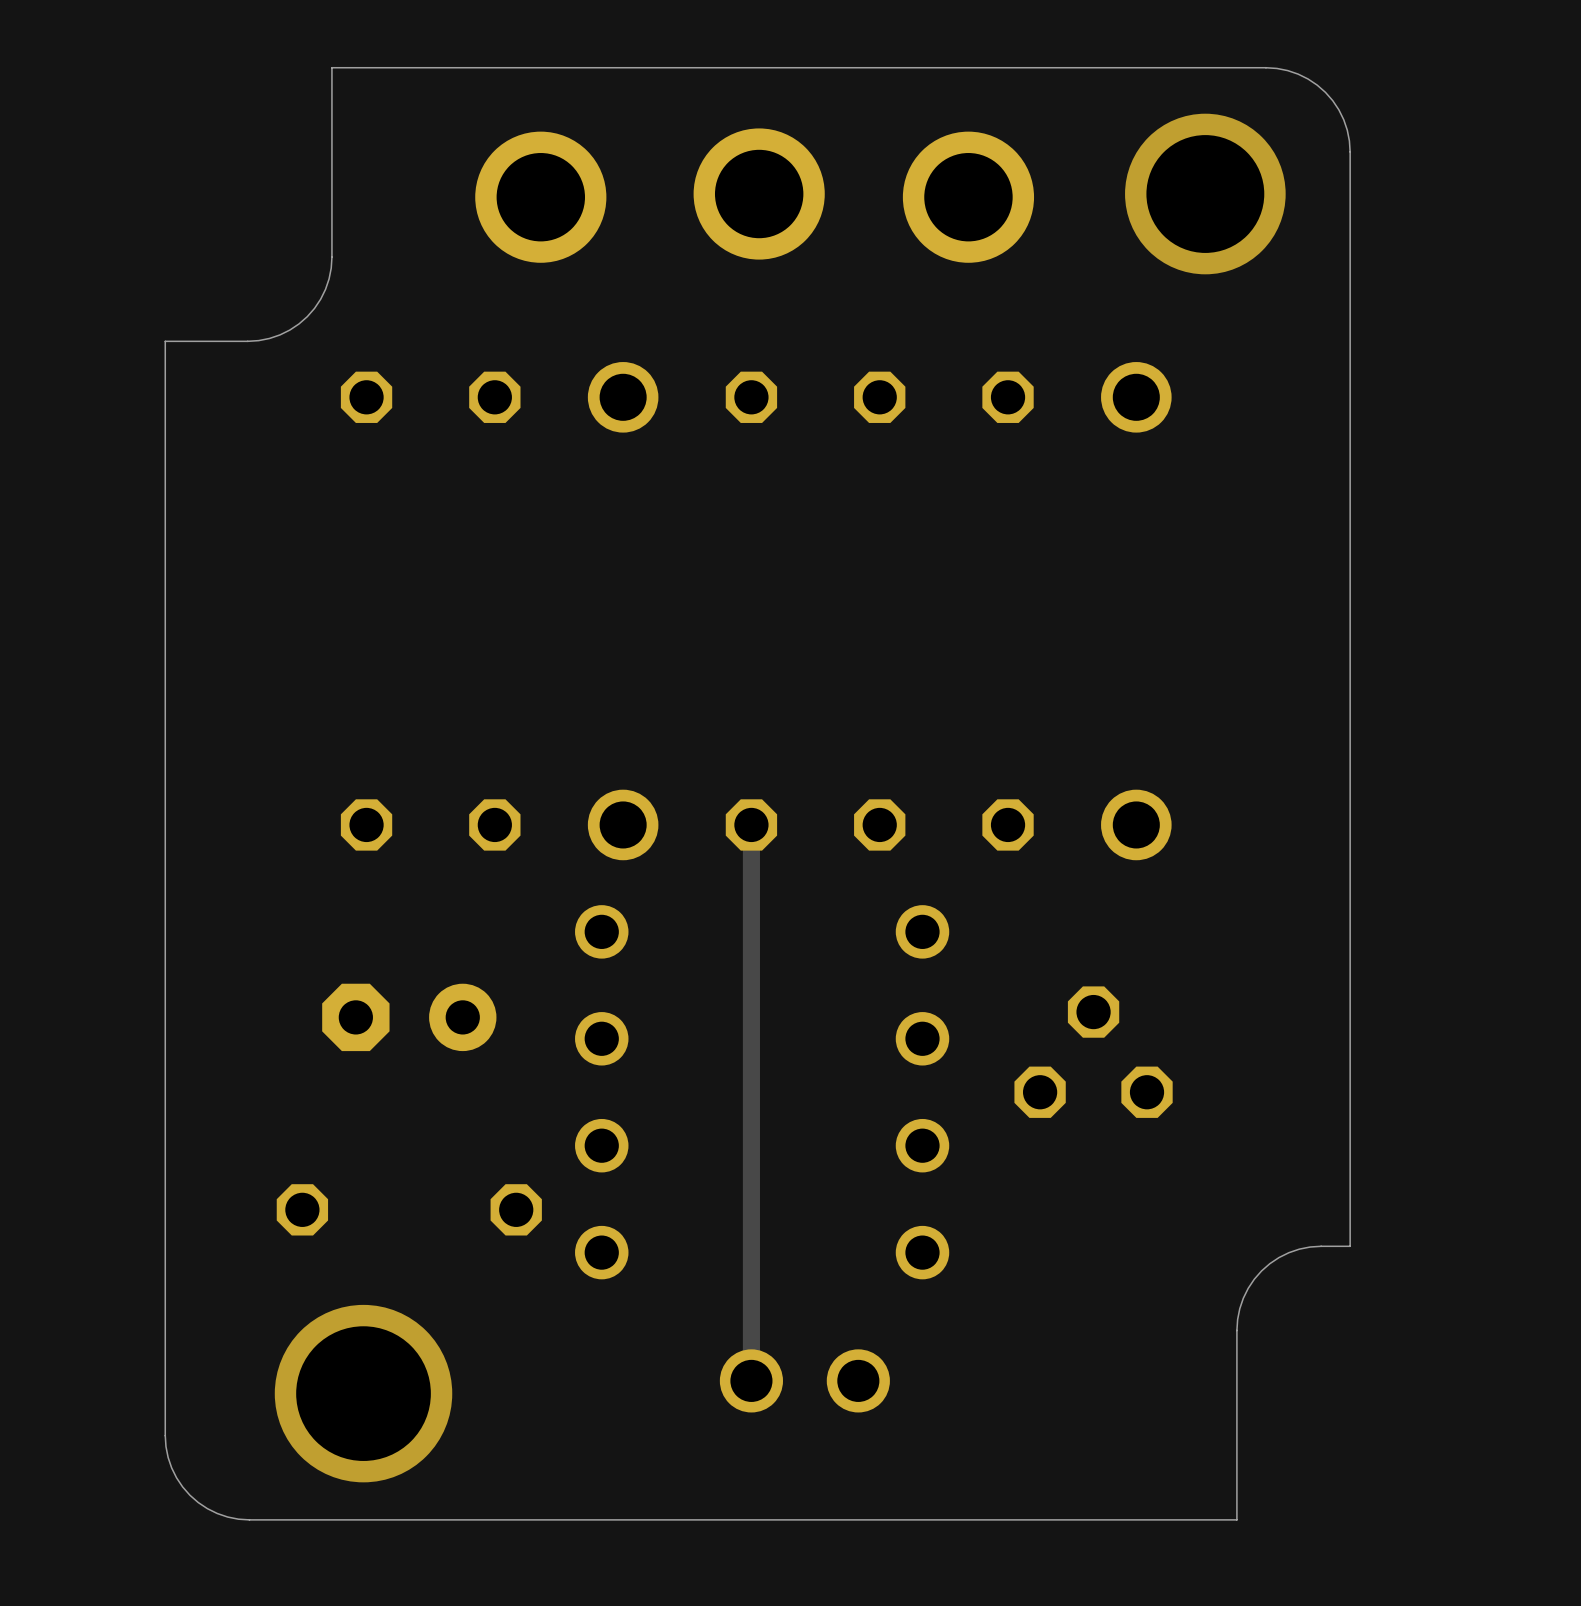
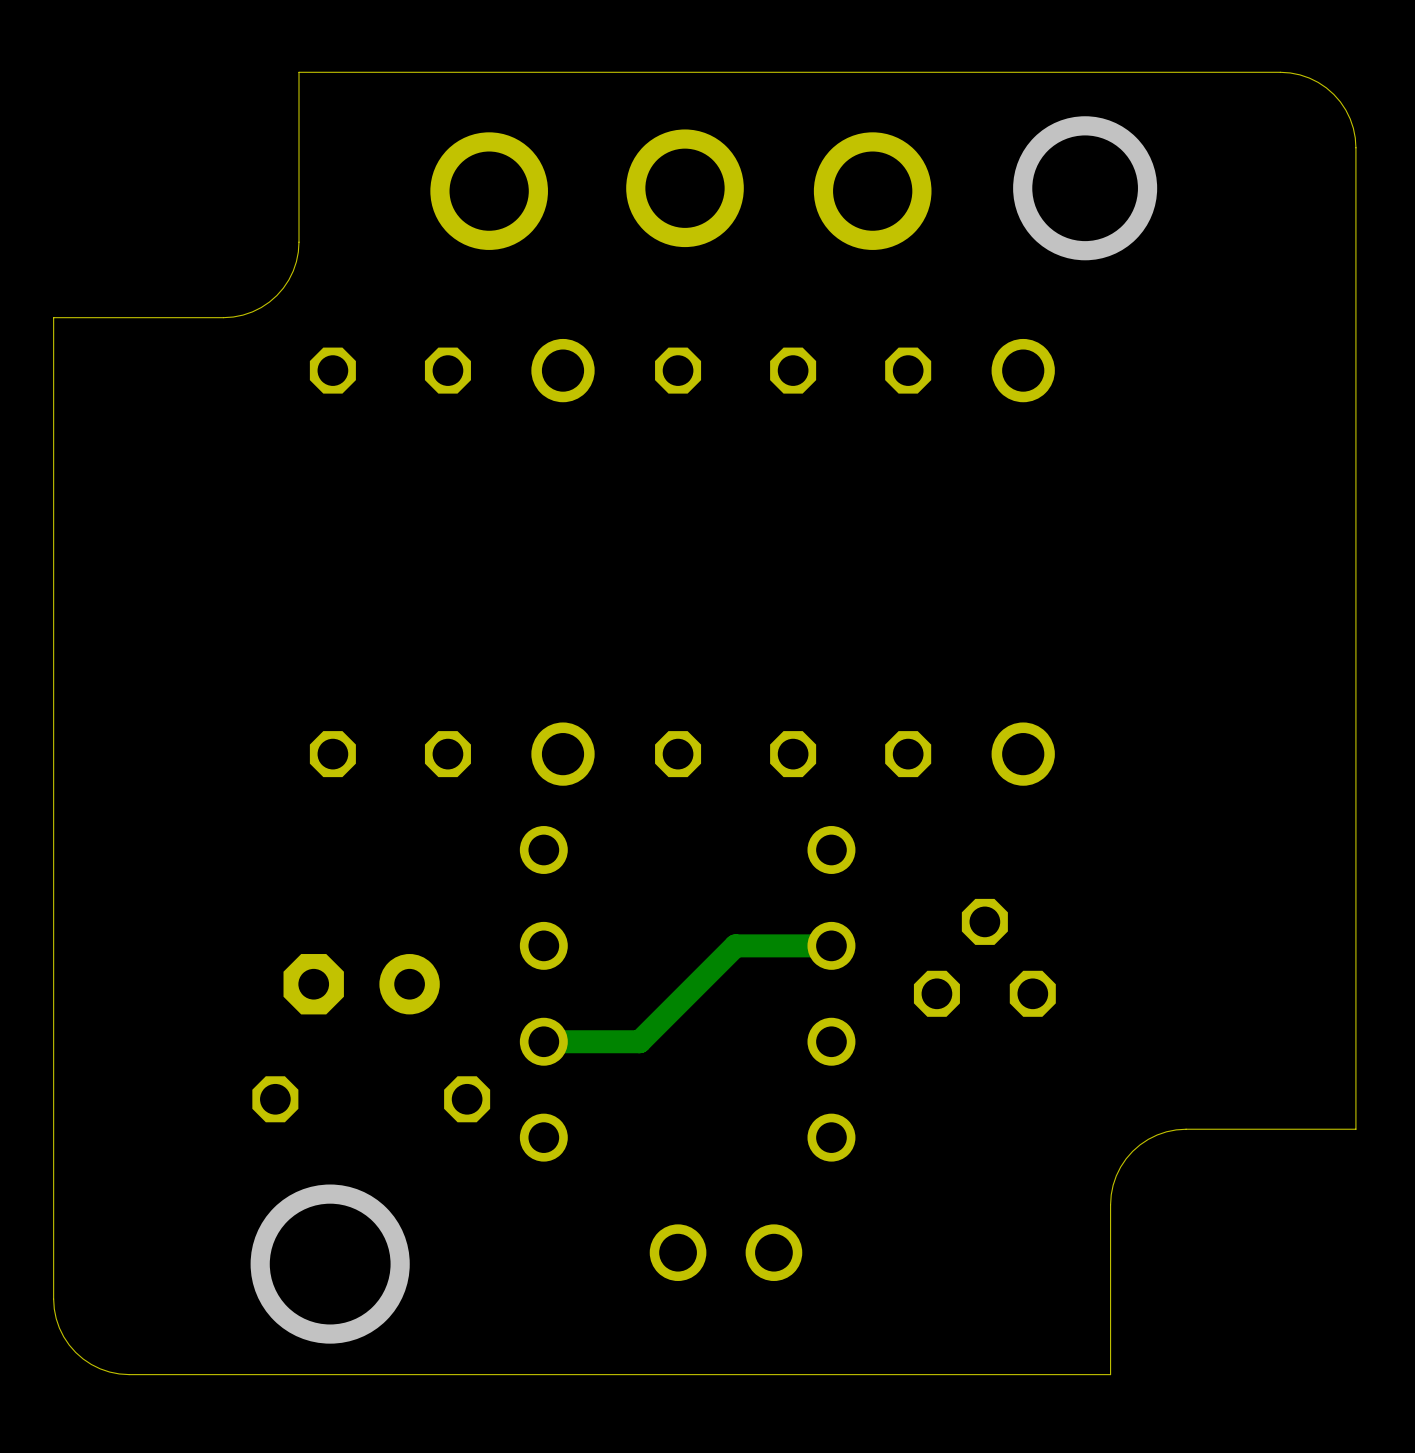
board edge: (1265, 67) (331, 67) (331, 257) (329, 278) (320, 299) (299, 323) (269, 338) (247, 341) (165, 341) (165, 1435) (171, 1467) (182, 1486) (198, 1502) (217, 1513) (249, 1519) (1236, 1519) (1236, 1330) (1243, 1298) (1261, 1270) (1288, 1252) (1310, 1247) (1350, 1246) (1349, 140) (1338, 109) (1317, 85) (1298, 74) (1265, 67) -> (1280, 72) (1309, 78) (1326, 87) (1345, 110) (1355, 137) (1355, 1129) (1176, 1129) (1148, 1139) (1132, 1151) (1120, 1166) (1111, 1194) (1110, 1374) (129, 1374) (100, 1368) (75, 1352) (59, 1328) (53, 1299) (53, 317) (233, 317) (261, 307) (276, 295) (288, 279) (298, 252) (298, 72) (1280, 72)
track: (751, 824) (751, 1380) -> none
part position: (409, 1017) -> (361, 984)
track: none -> (821, 945) (735, 945) (639, 1041) (534, 1041)

